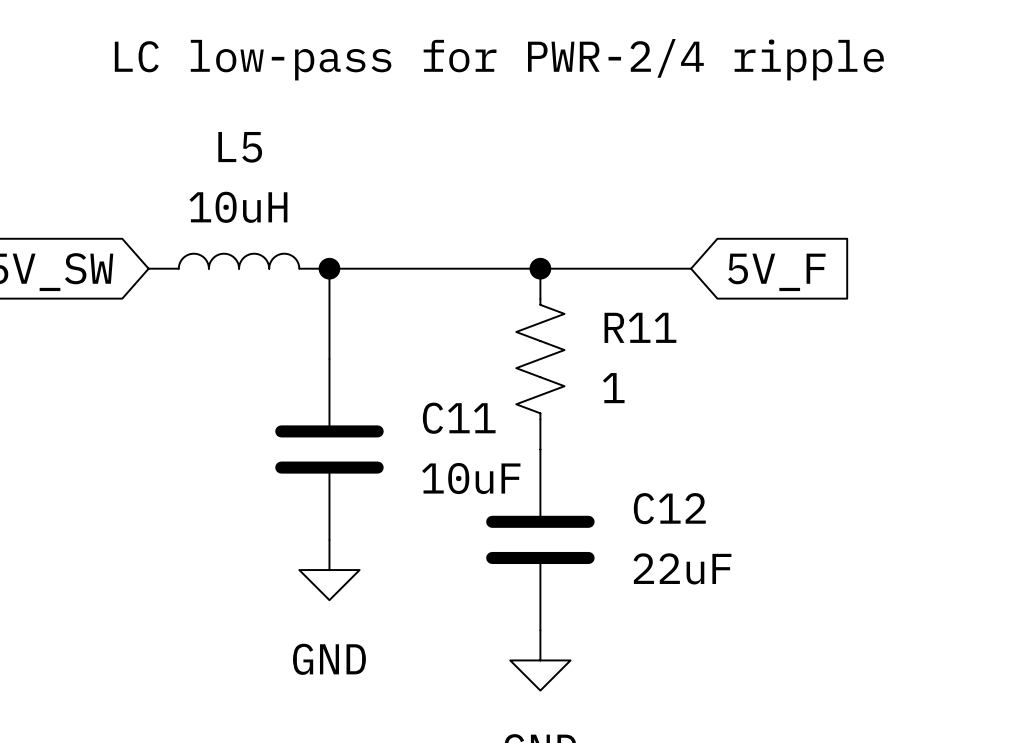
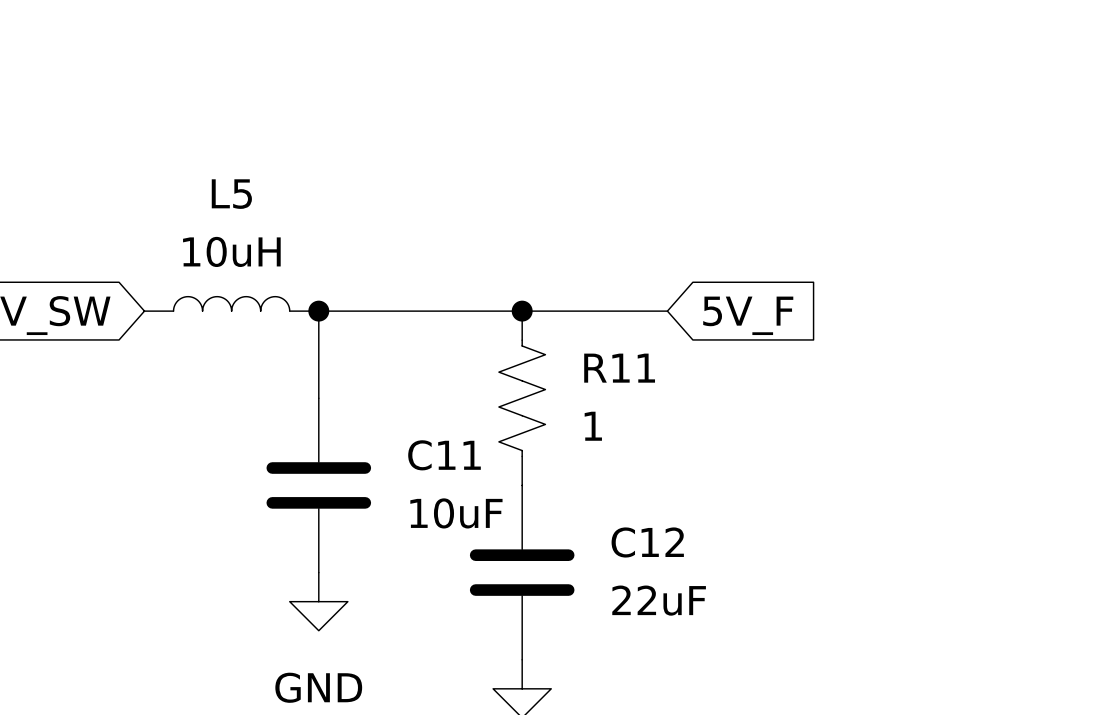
text: LC low-pass for PWR-2/4 ripple (499, 59) -> none

